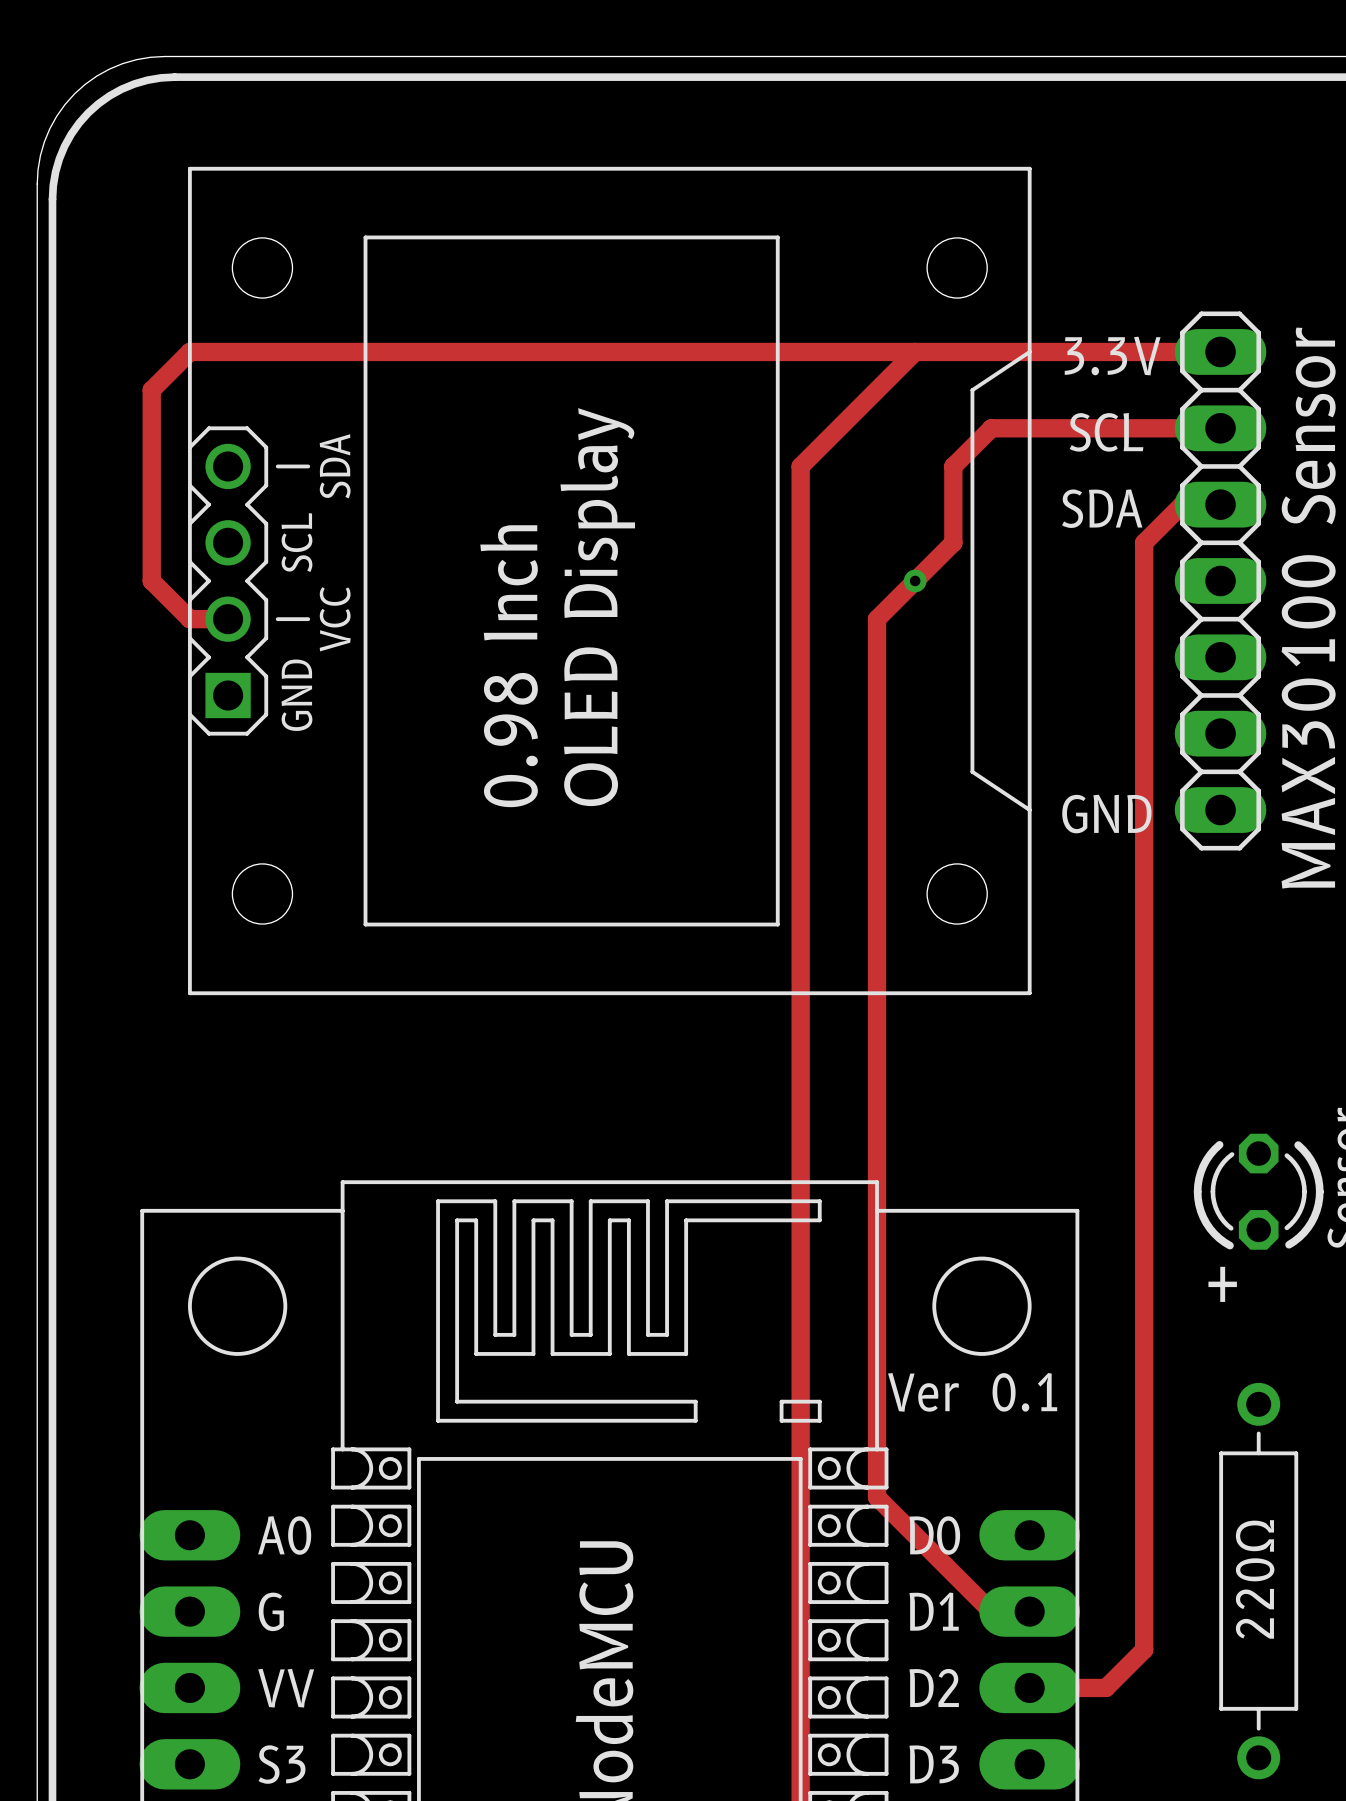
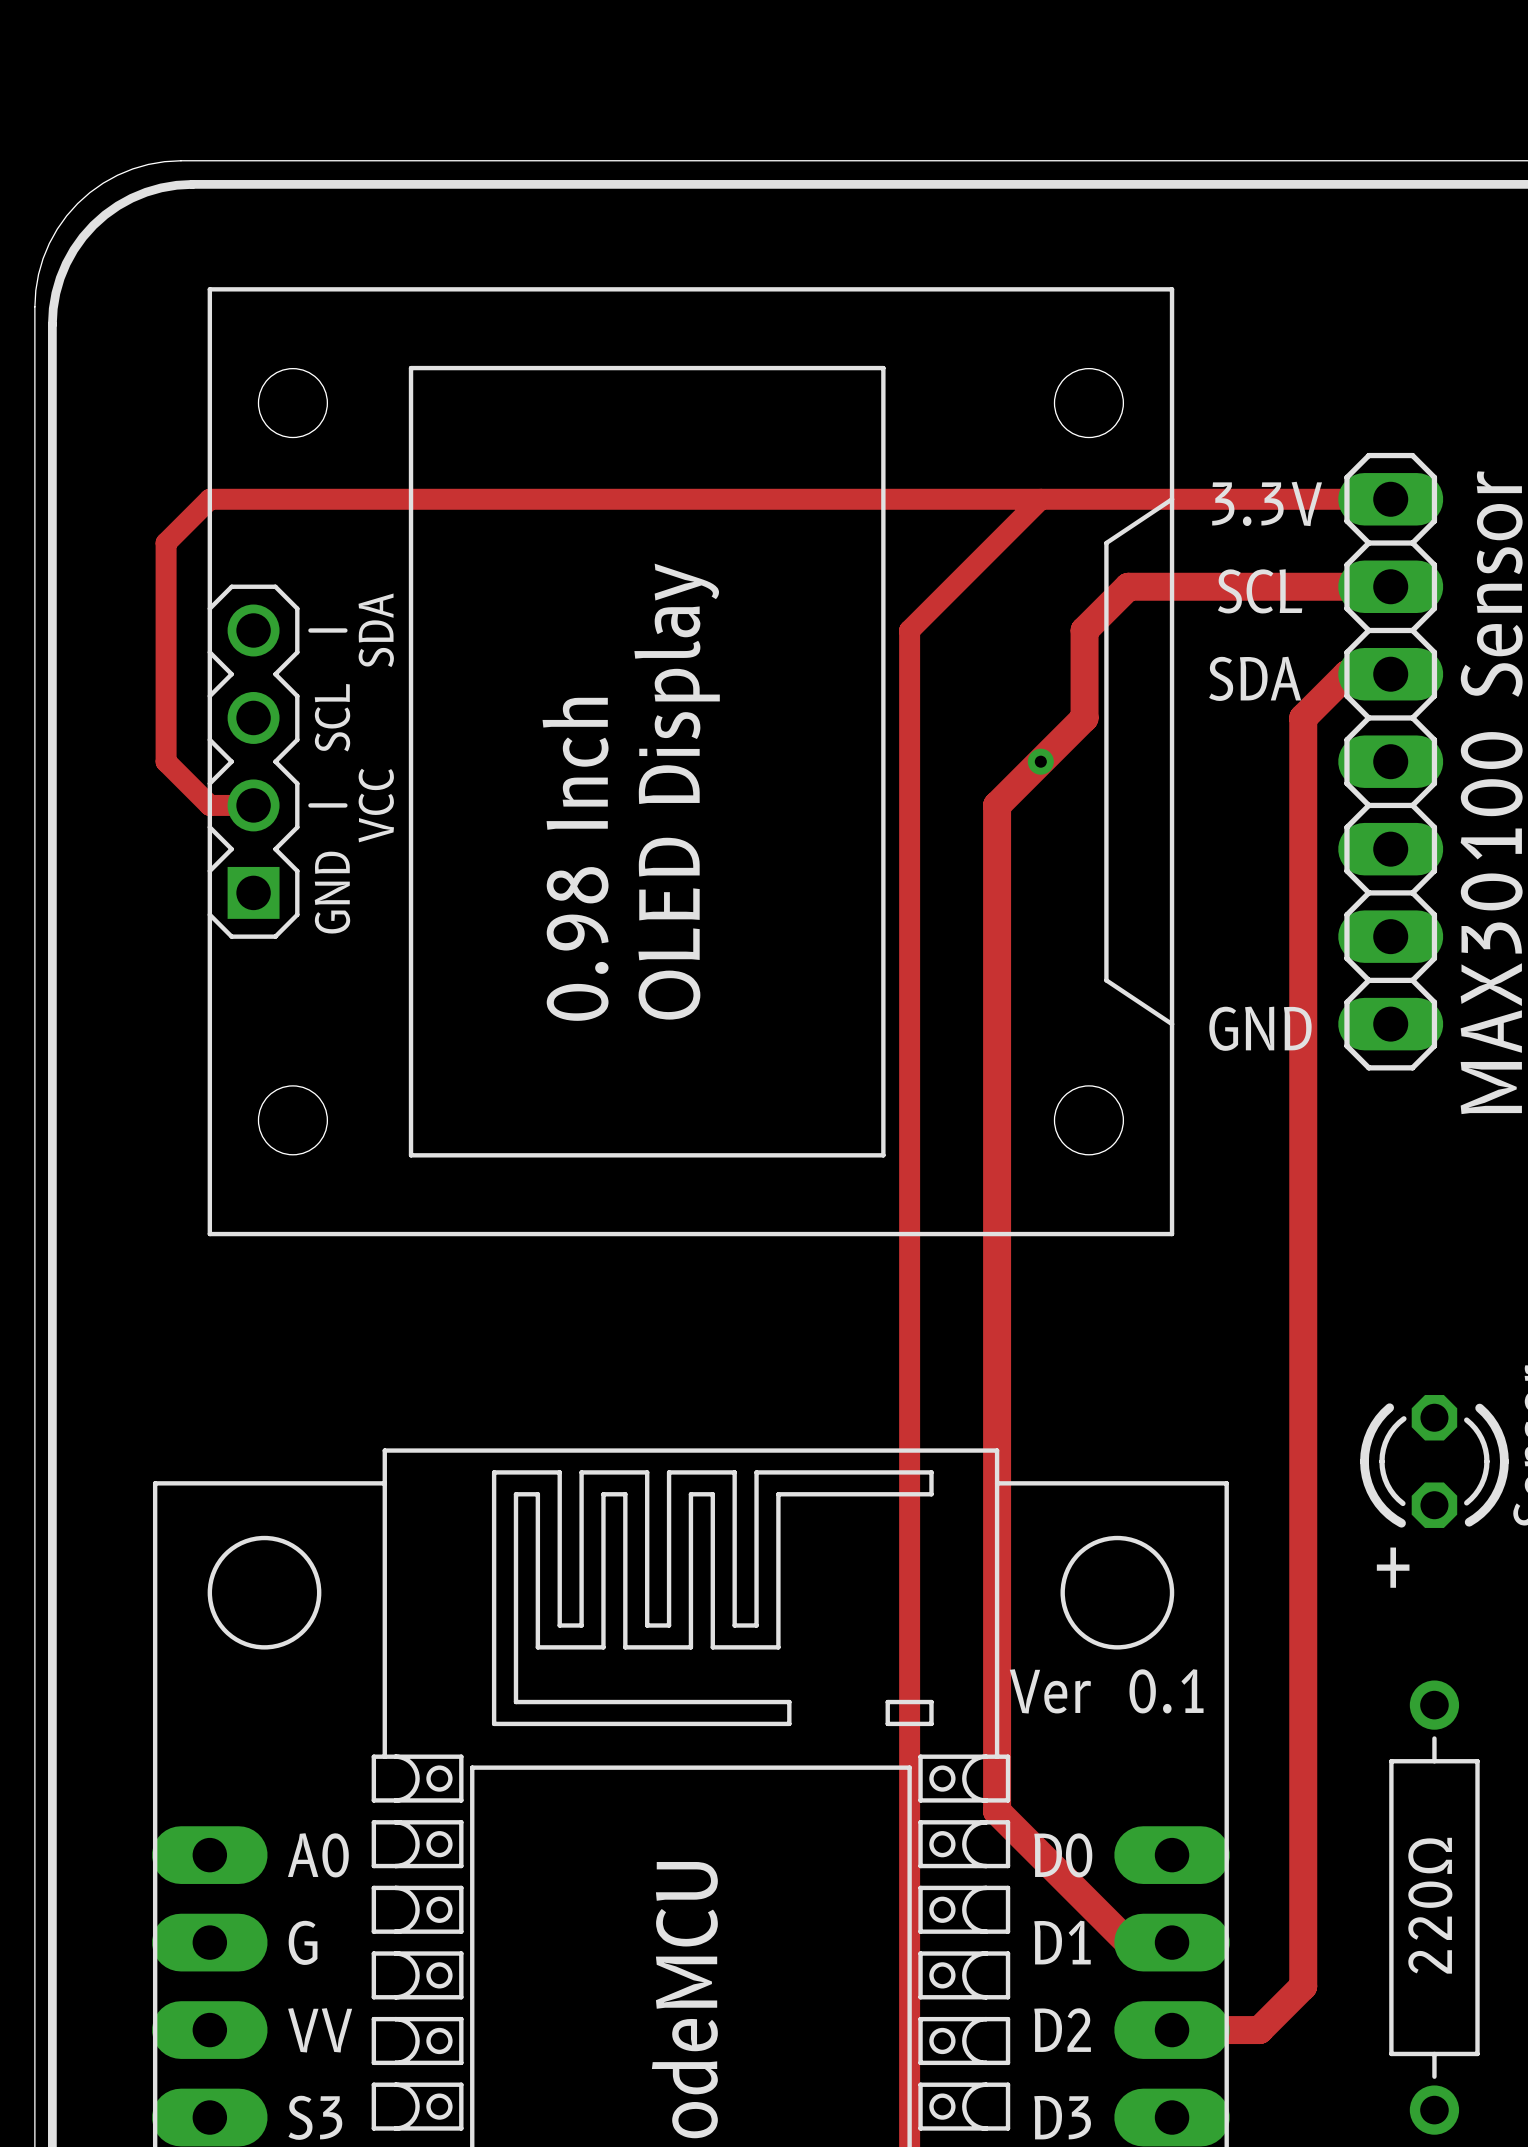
track width: thin (1220, 428) (991, 428) (953, 466) (953, 542) (877, 619) (877, 1497) (991, 1611) (1029, 1611) -> thick (1390, 586) (1128, 586) (1084, 630) (1084, 717) (997, 805) (997, 1811) (1128, 1942) (1172, 1942)
track width: thin (1220, 504) (1182, 504) (1144, 542) (1144, 1649) (1106, 1687) (1029, 1687) -> thick (1390, 674) (1346, 674) (1303, 717) (1303, 1986) (1259, 2030) (1172, 2030)

